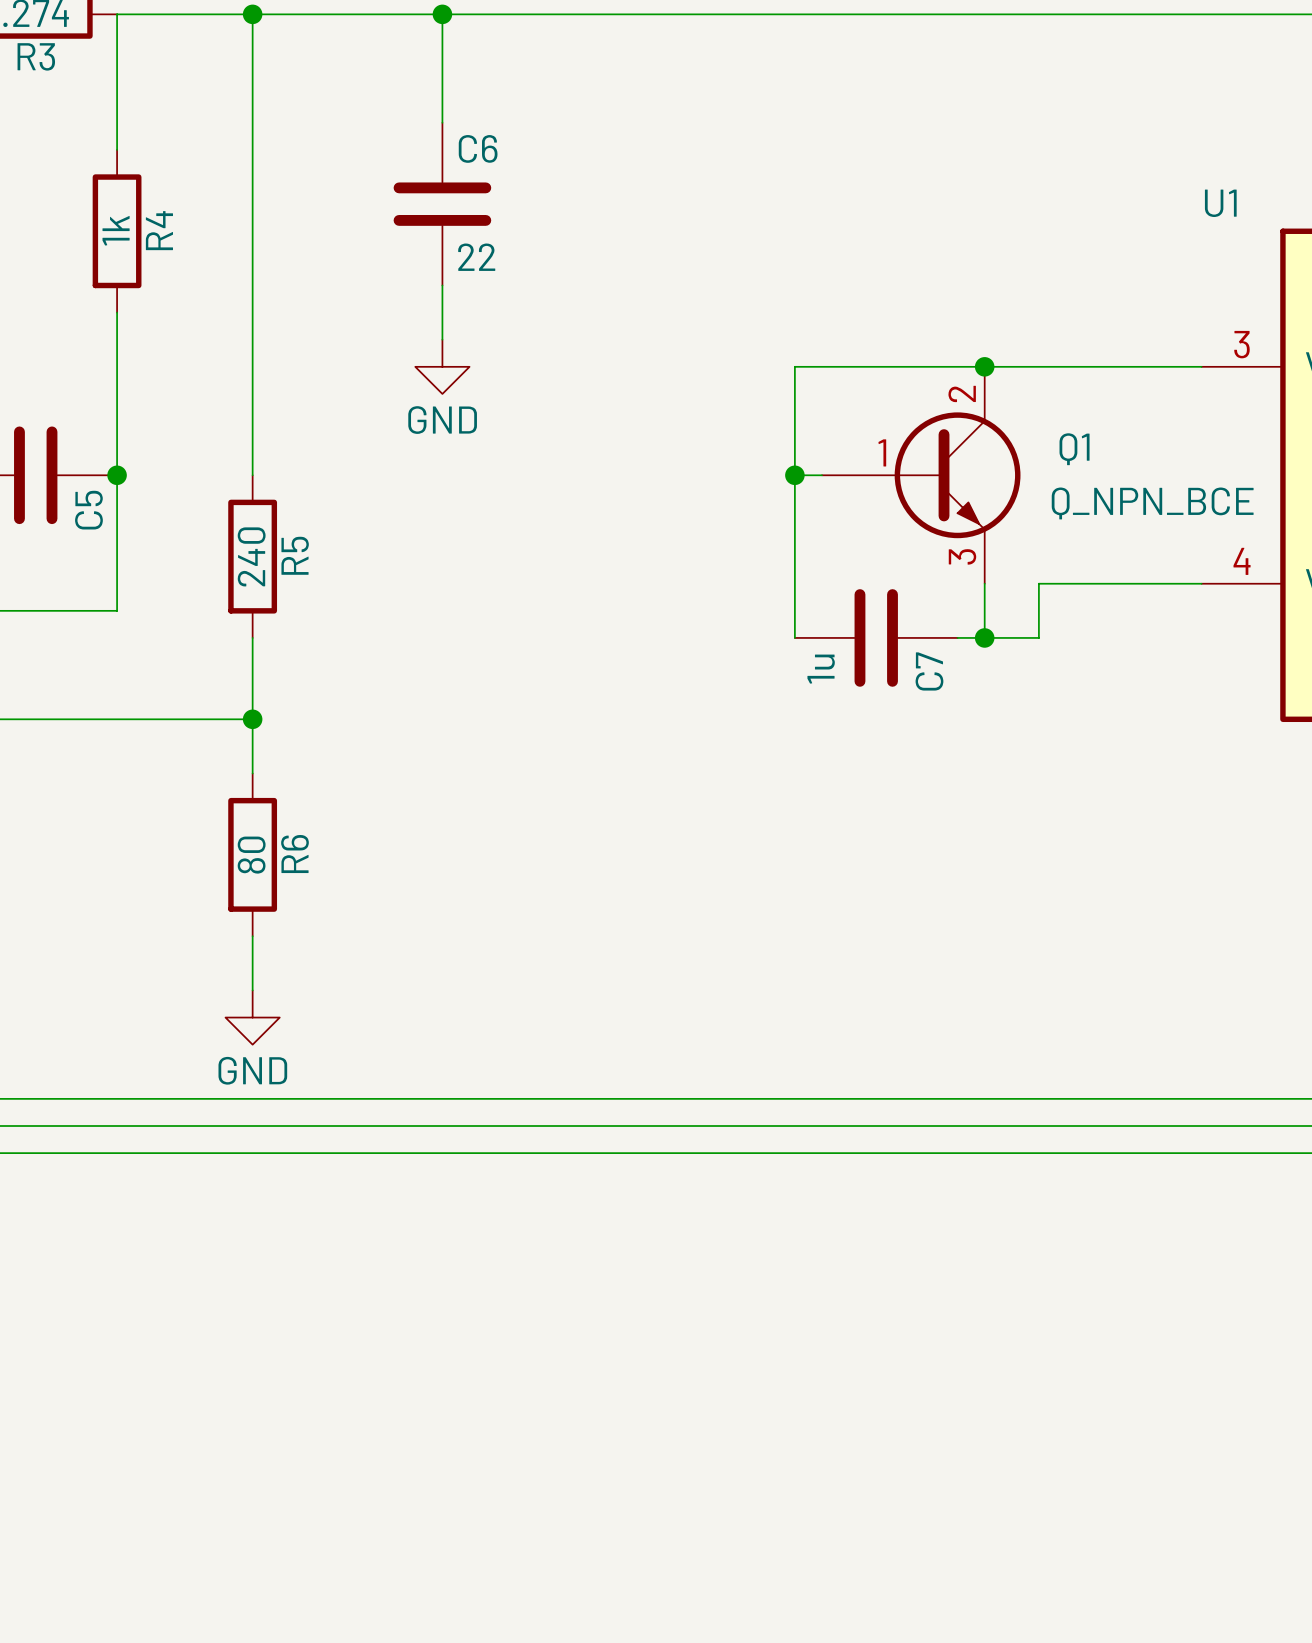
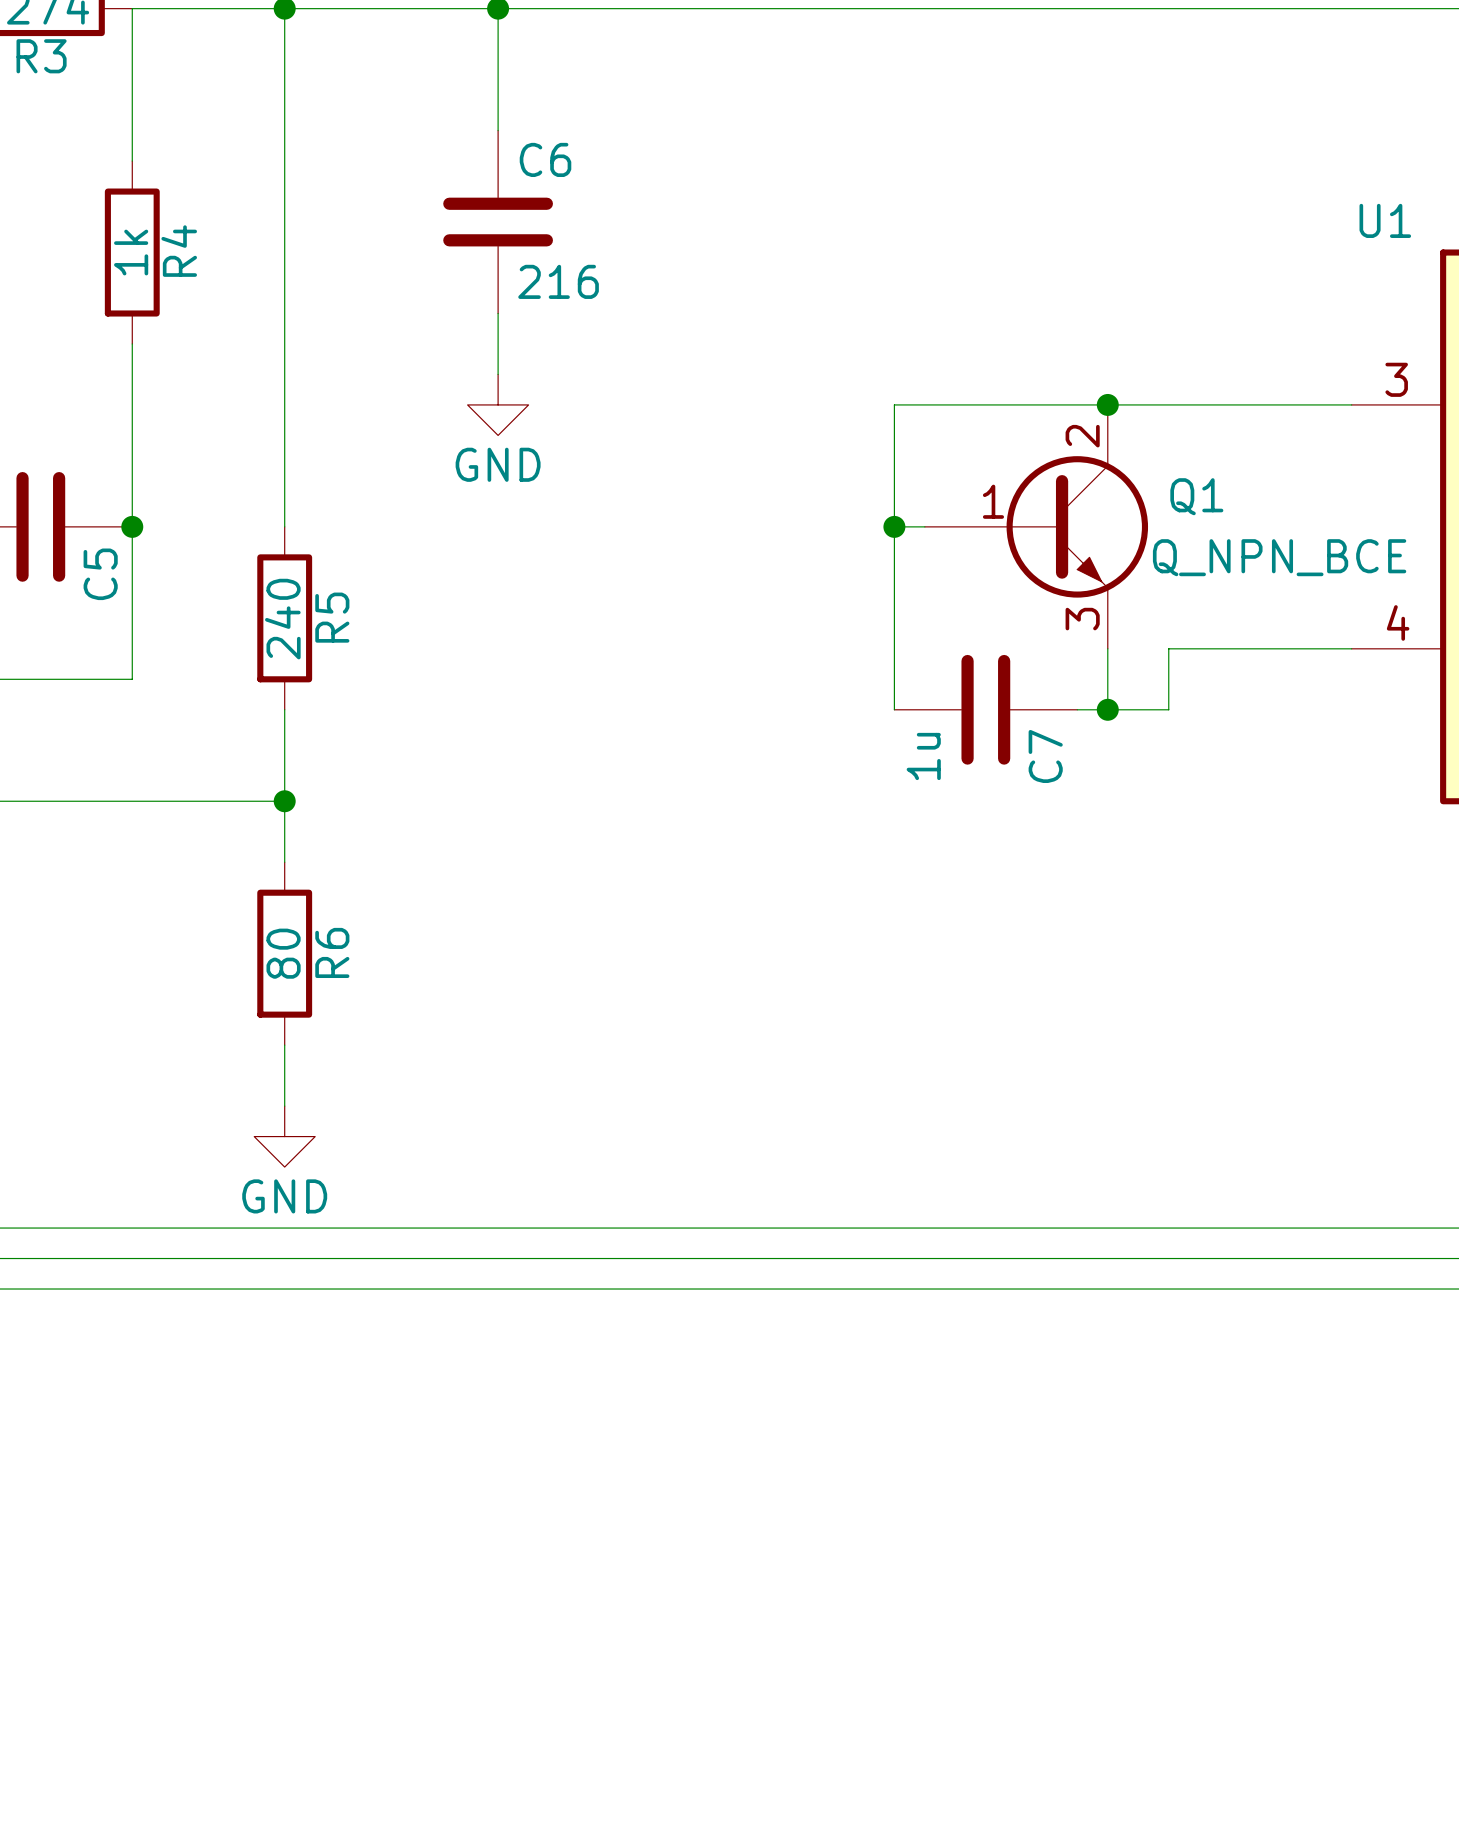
C6 value: 22 (476, 257) -> 216 (558, 281)

